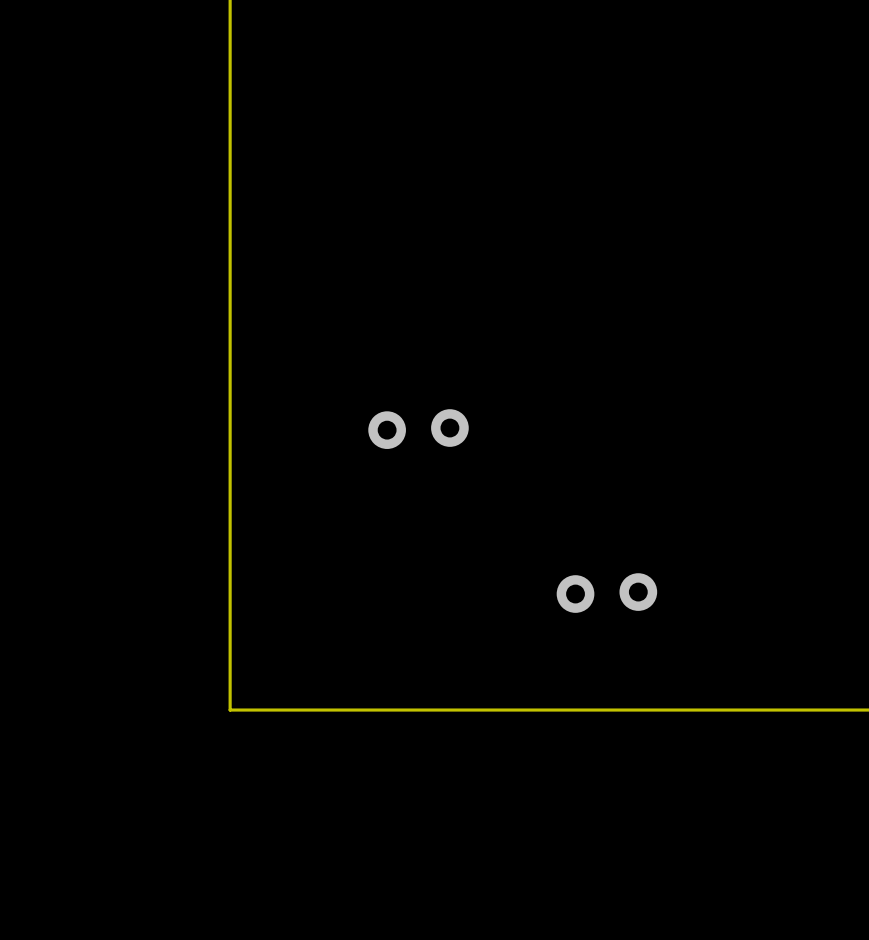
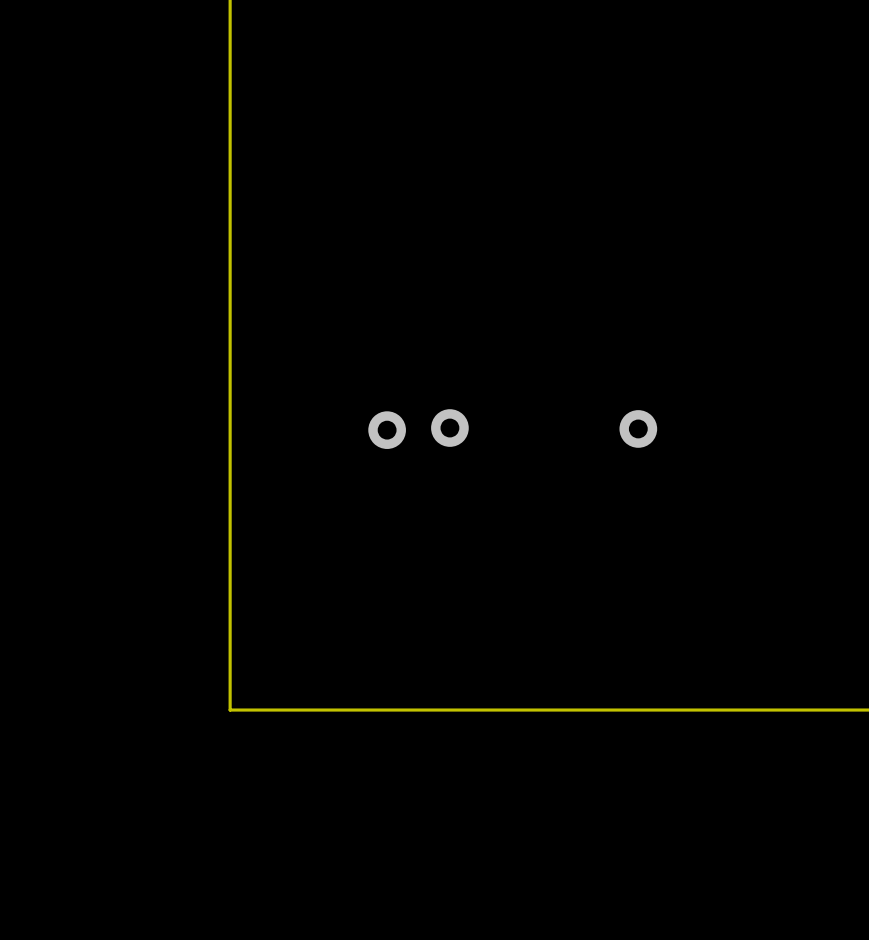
via: none -> (638, 428)
via: (638, 592) -> none
via: (575, 594) -> none

